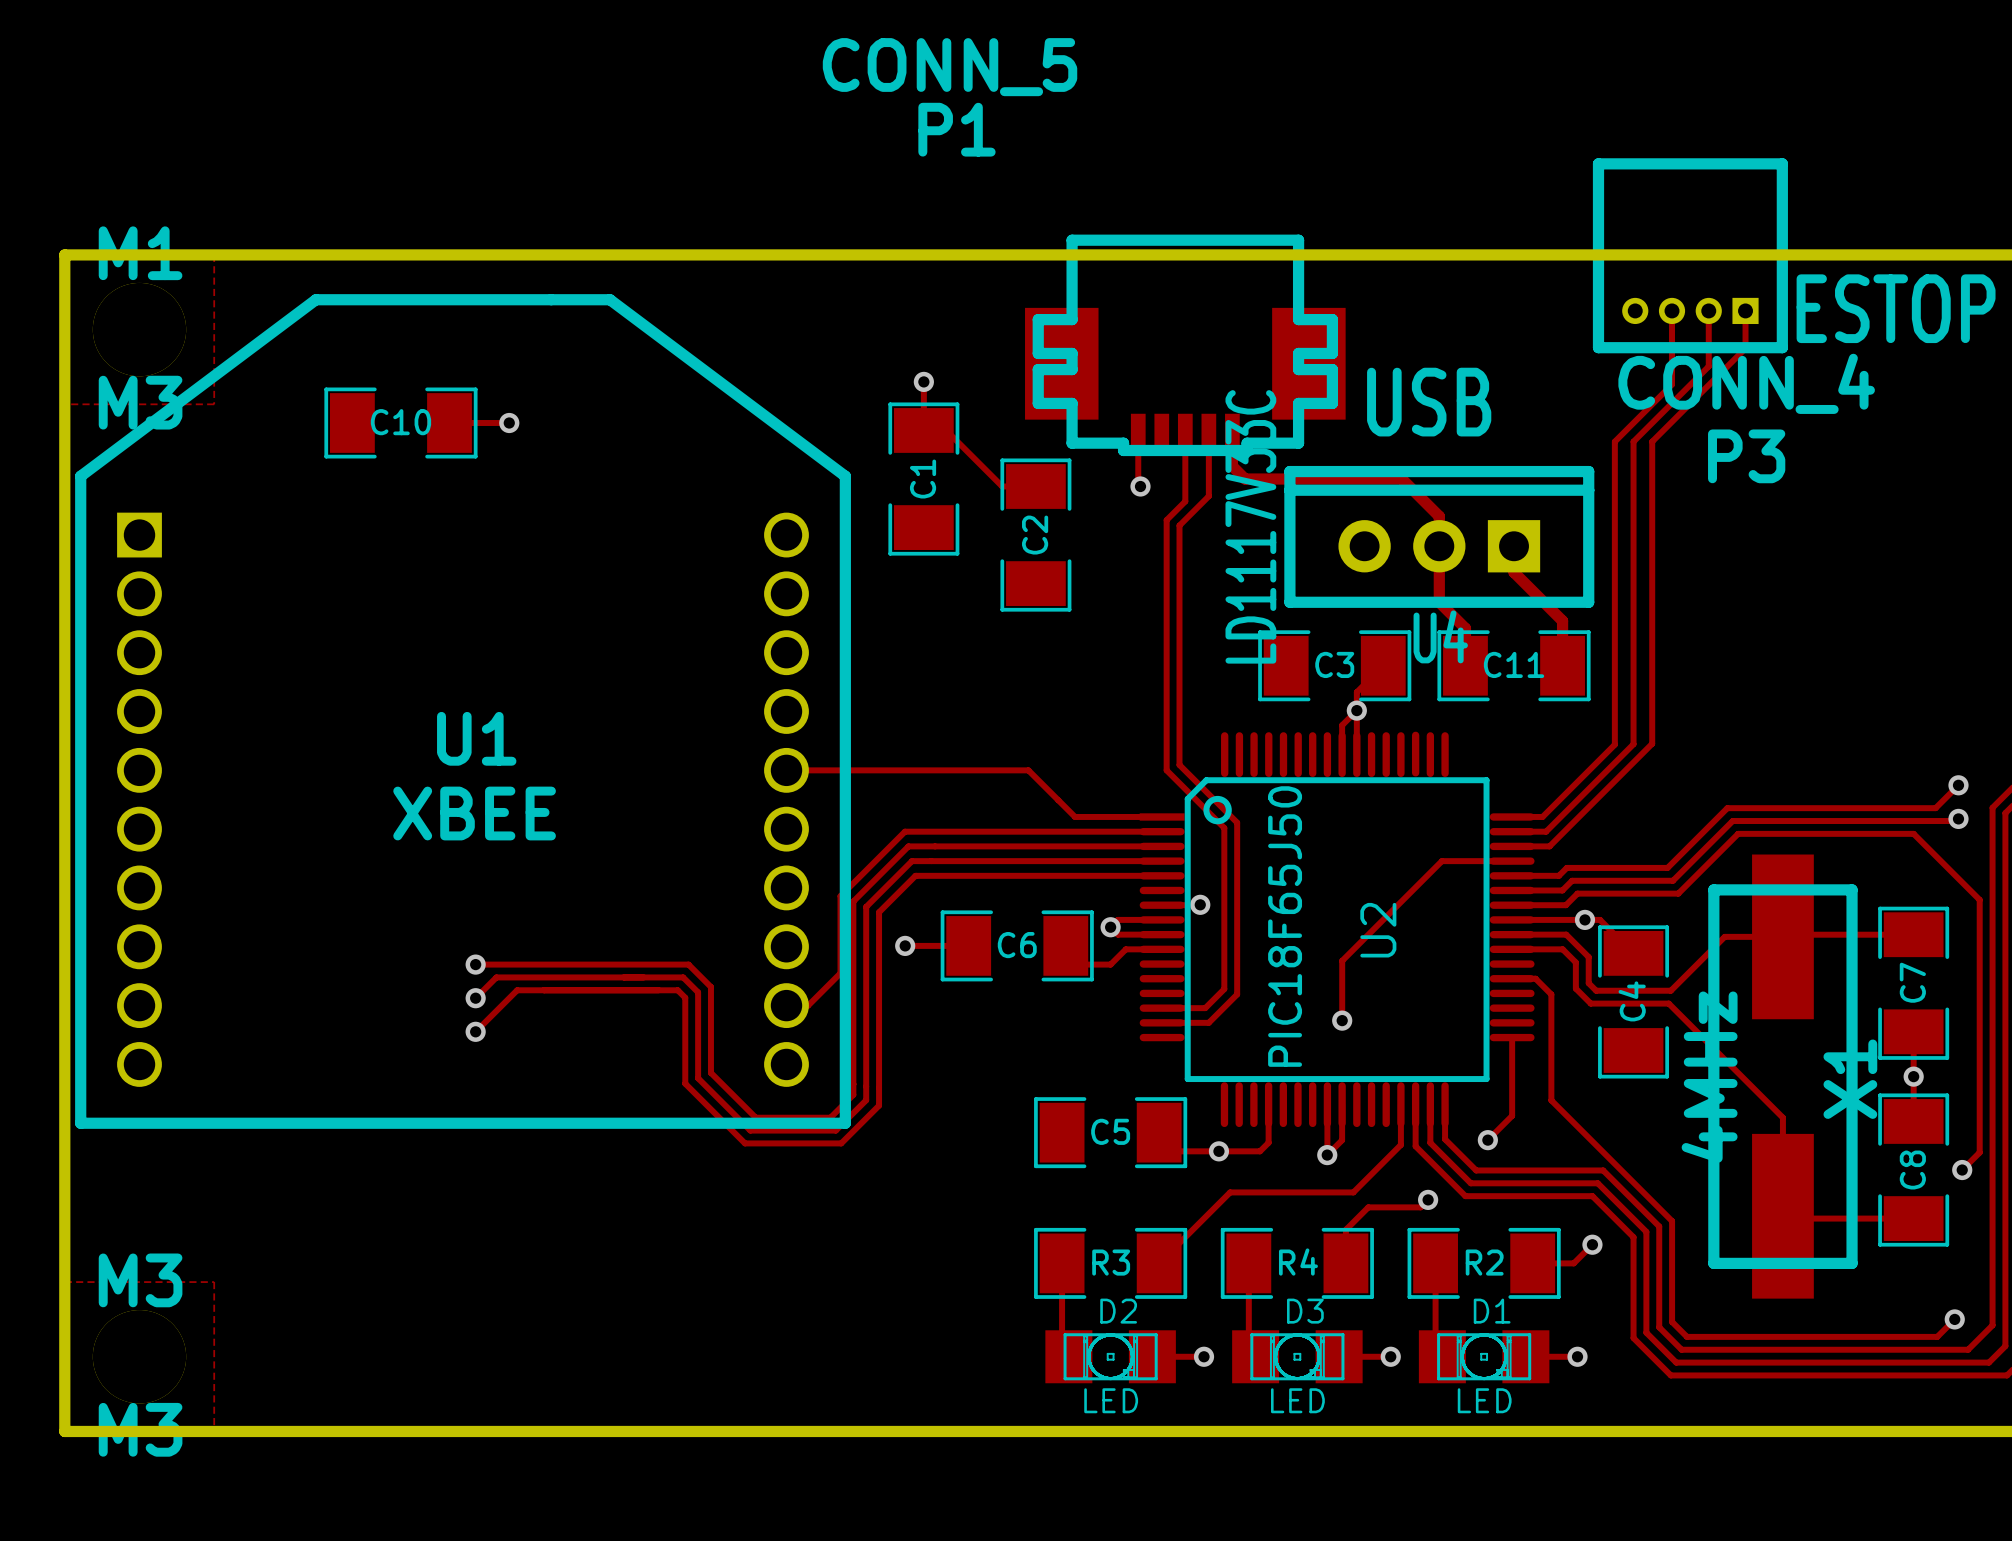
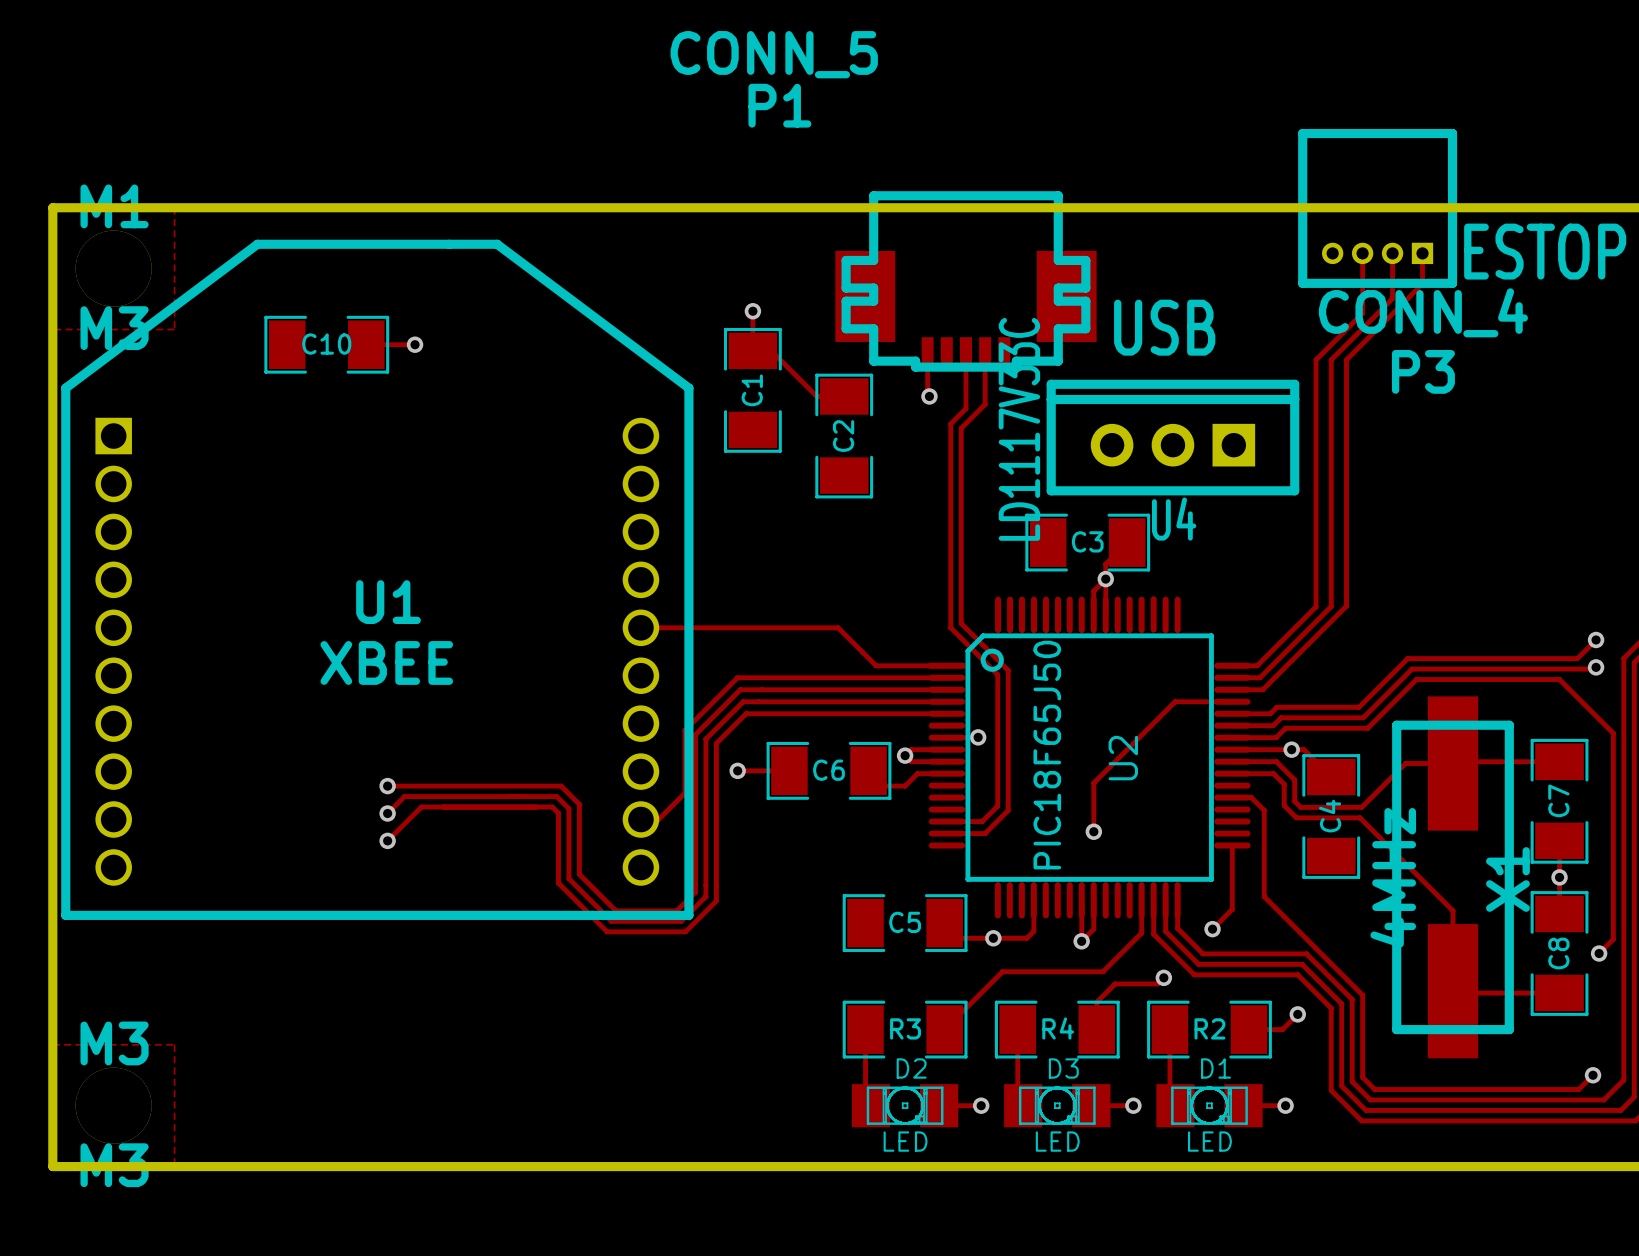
track: (1232, 434) (1232, 466) (1245, 479) (1401, 479) (1439, 516) (1439, 602) (1465, 628) (1465, 665) -> none
track: (1514, 546) (1514, 572) (1562, 620) (1562, 665) -> none
C11: (1514, 665) -> none

